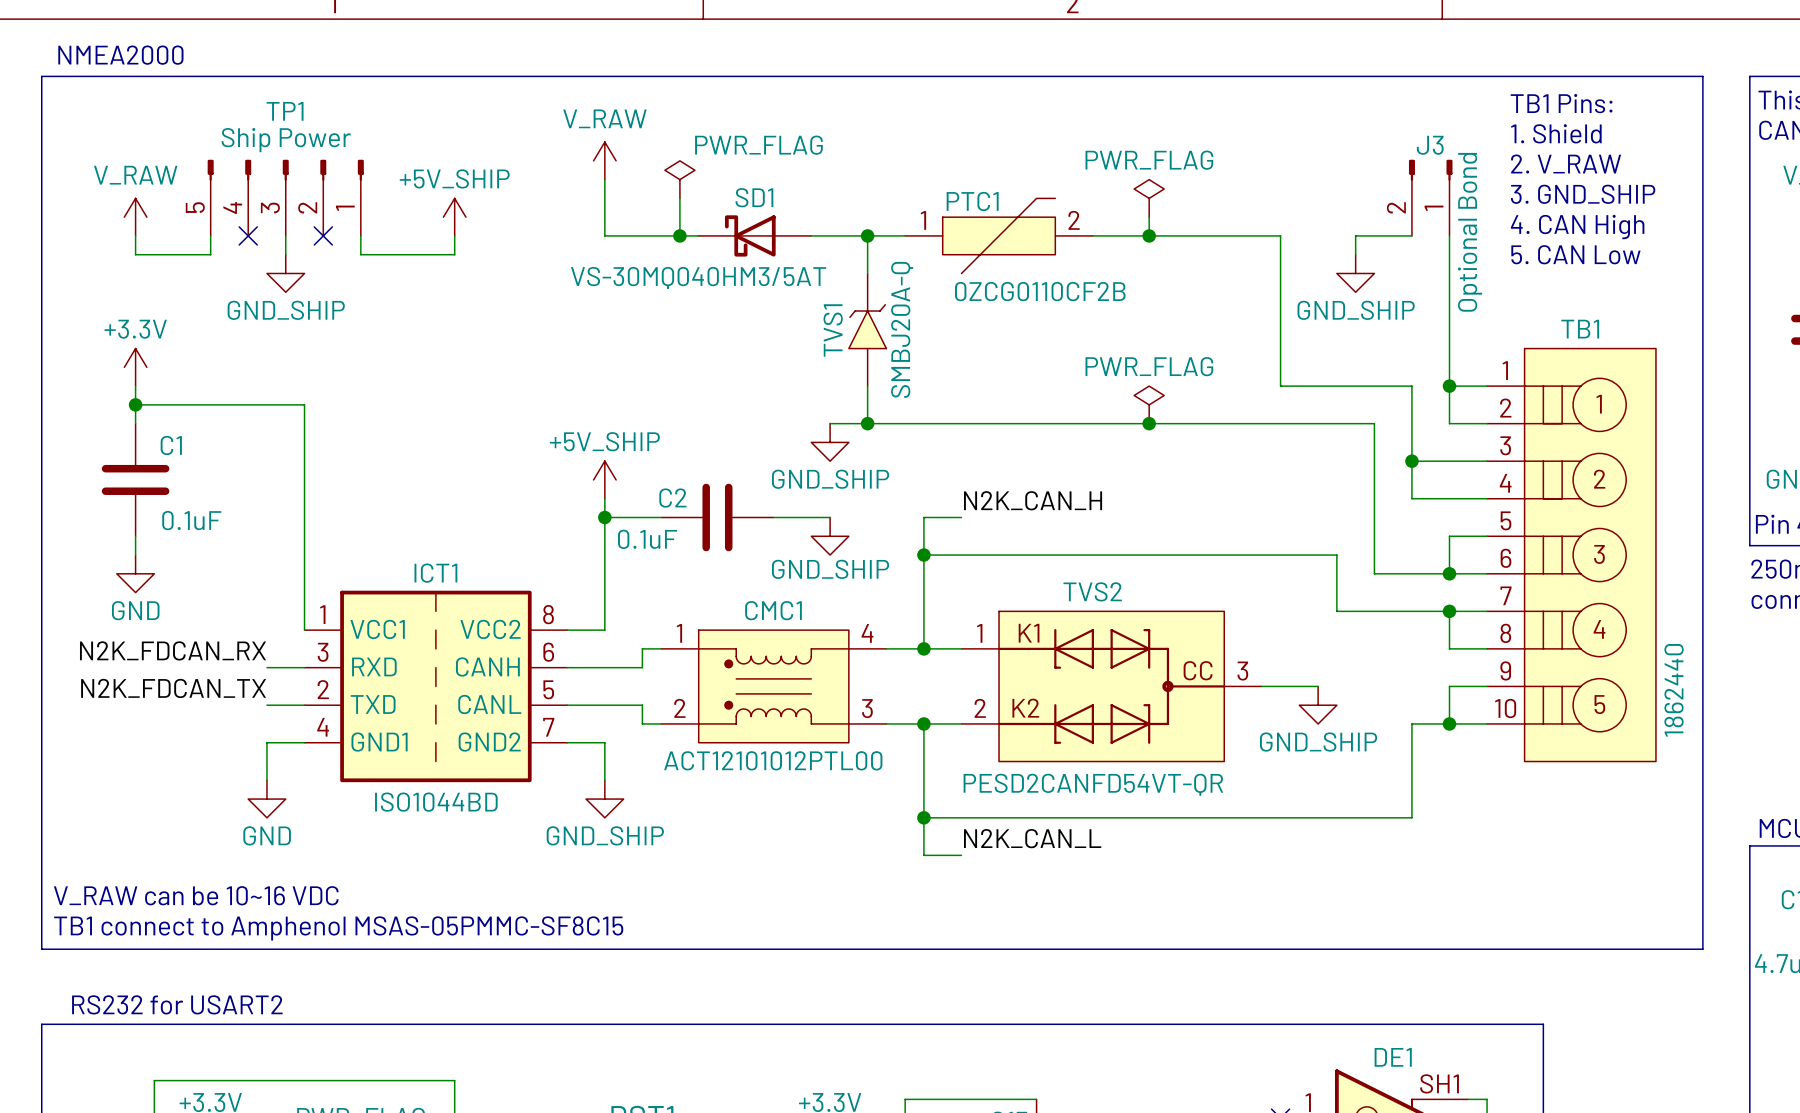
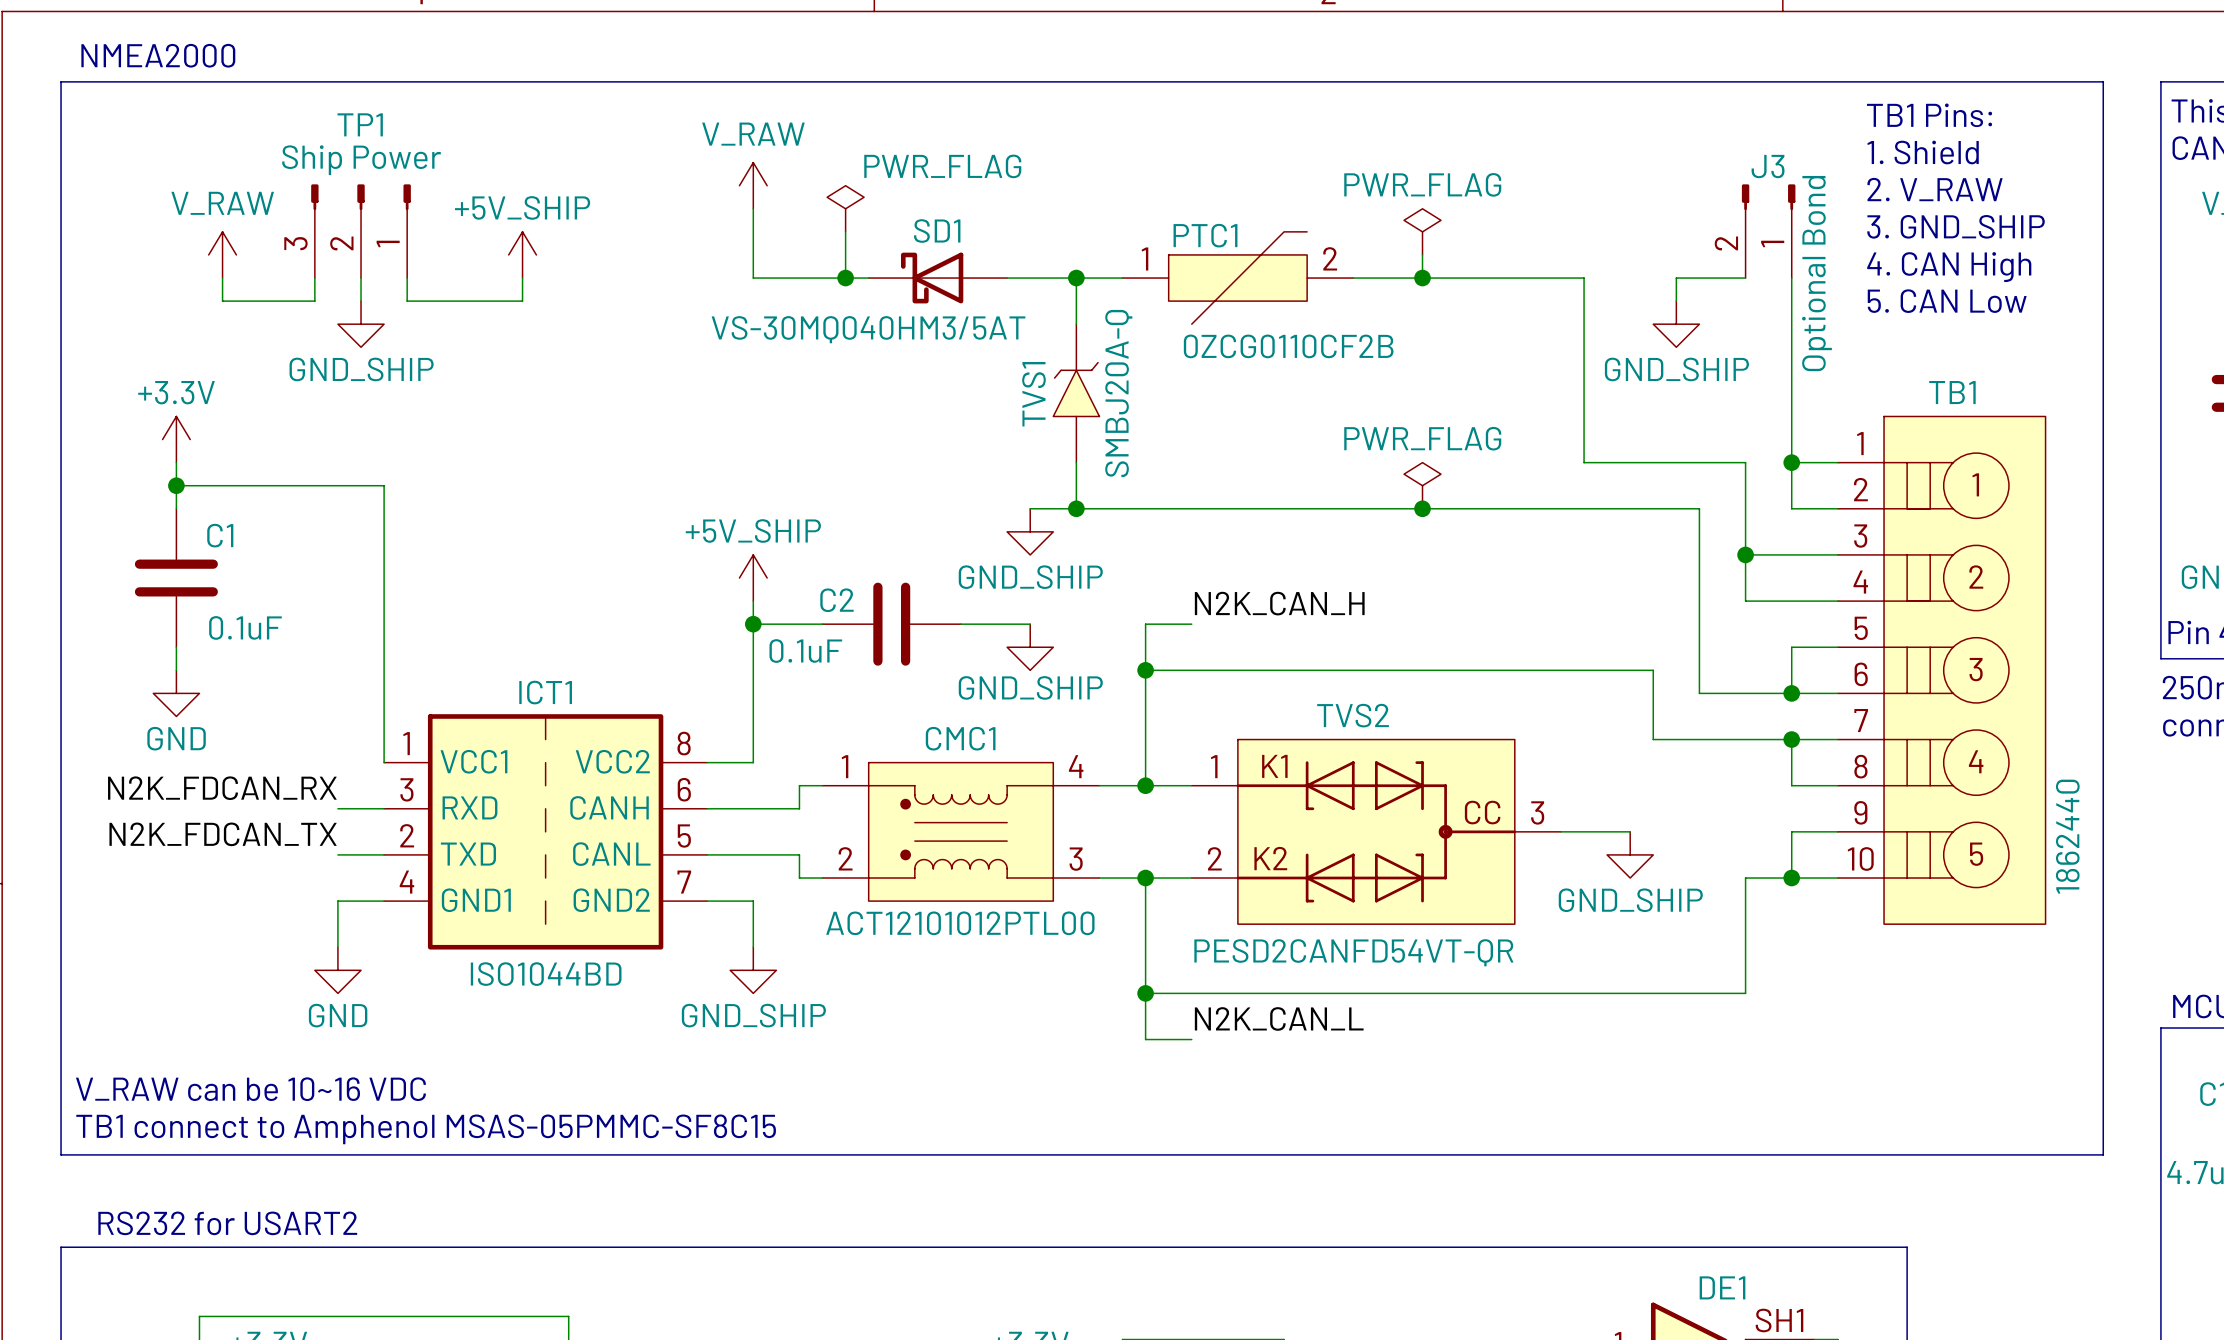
TP1 symbol: [207, 159, 364, 236] -> [311, 184, 411, 279]
power symbol position: V_RAW (135, 217) -> V_RAW (222, 254)
power symbol position: +5V_SHIP (454, 217) -> +5V_SHIP (522, 254)
wire: (135, 235) (135, 254) (173, 254) -> (222, 278) (222, 301)
wire: (210, 235) (210, 254) -> (314, 278) (314, 301) (268, 301)
no-connect mark: (248, 235) -> none
no-connect mark: (323, 235) -> none
wire: (360, 235) (360, 254) -> (407, 278) (407, 301) (453, 301)
wire: (454, 235) (454, 254) (417, 254) -> (522, 278) (522, 301)

